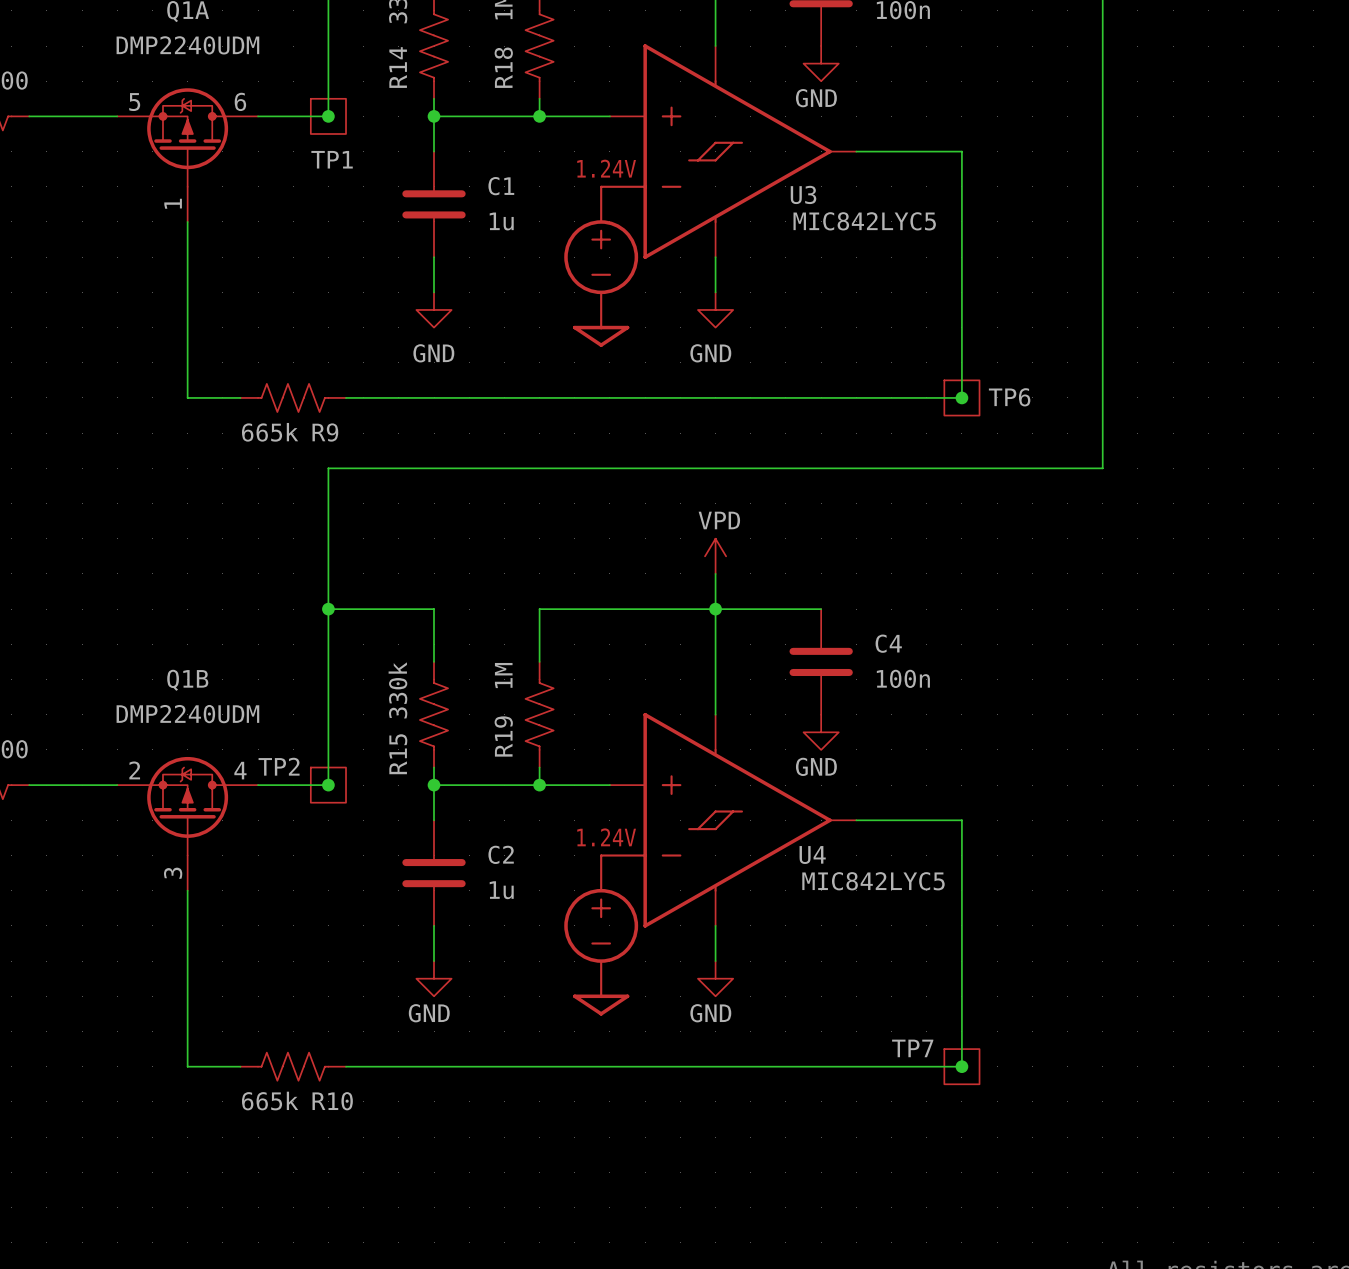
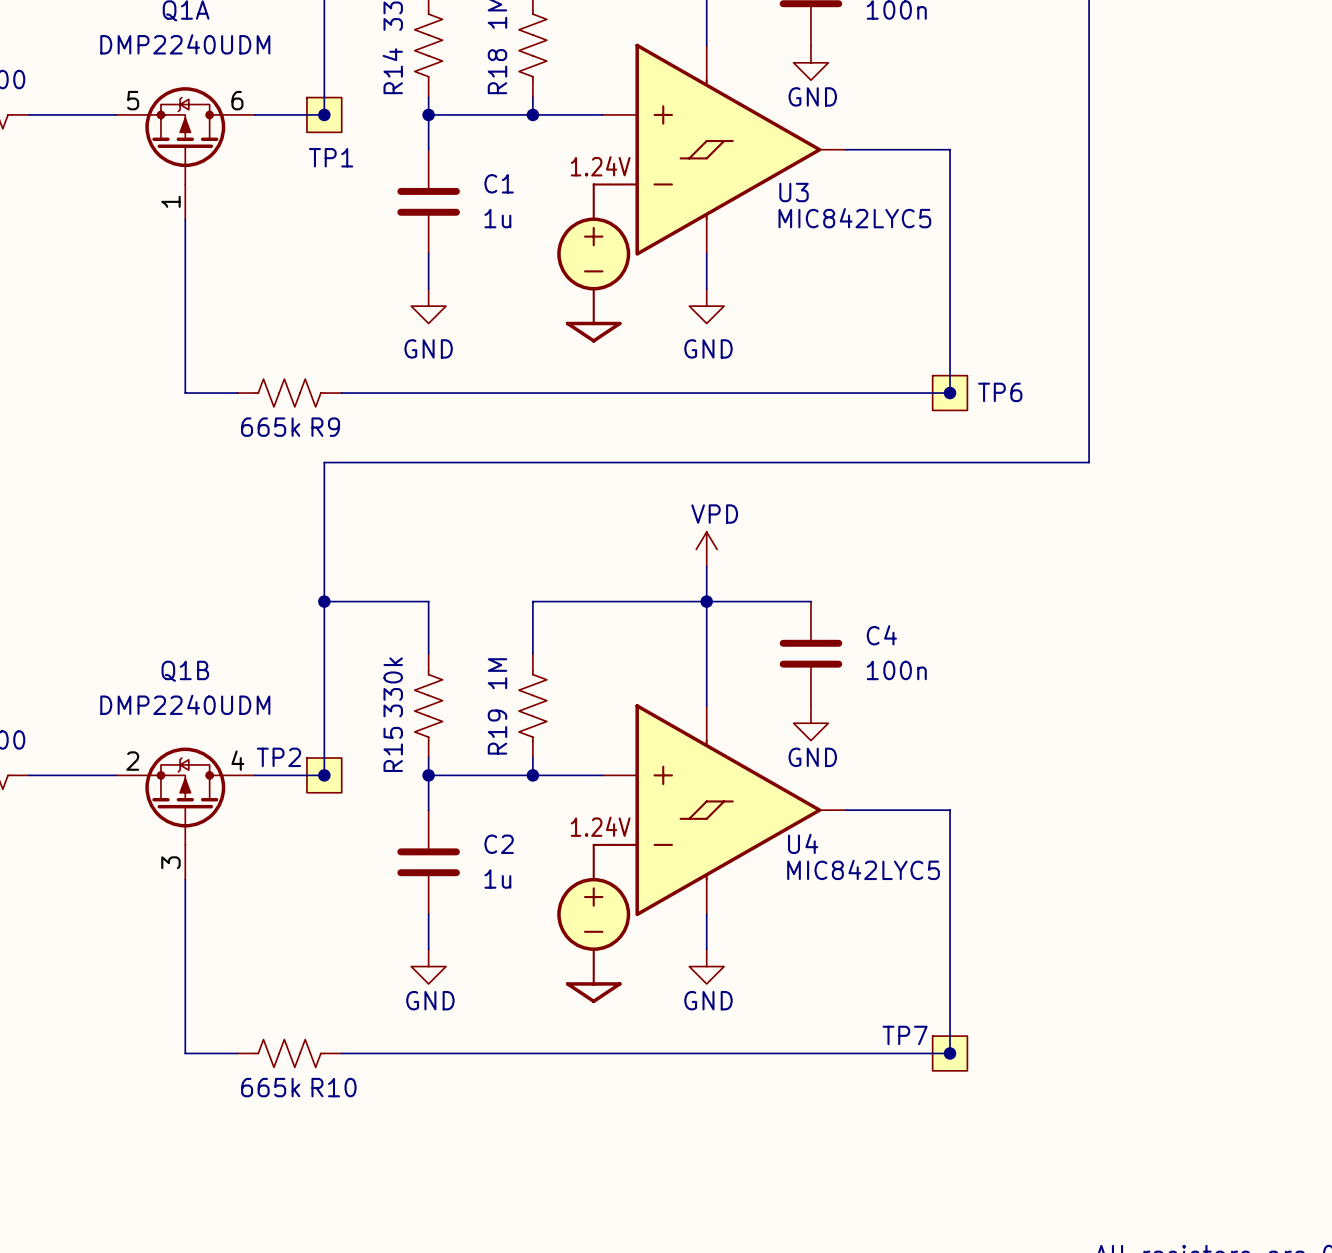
U3 symbol: [564, 44, 857, 347] -> [557, 43, 846, 343]
U4 symbol: [564, 712, 857, 1016] -> [557, 704, 846, 1004]

